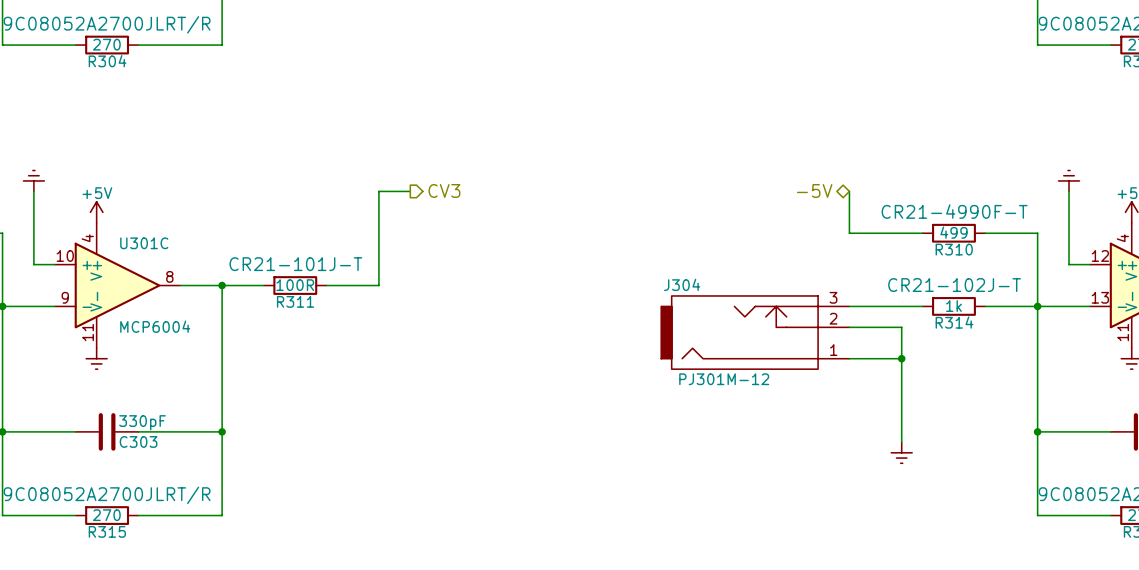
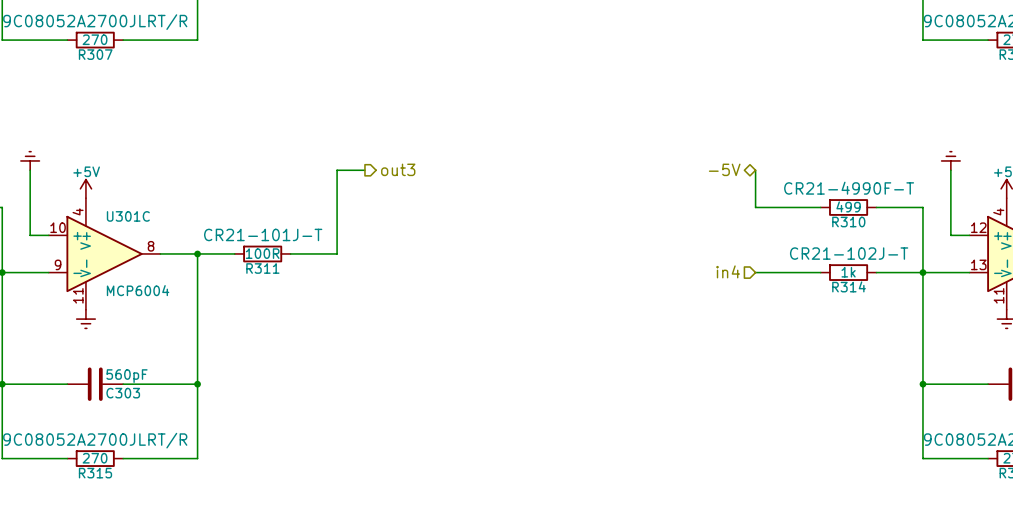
R304 name: R304 (107, 61) -> R307 (95, 54)
hierarchical label: CV3 (444, 190) -> out3 (398, 169)
hierarchical label: none -> in4 (728, 271)
wire: (849, 327) (901, 327) (901, 442) -> none
J304: PJ301M-12 (755, 332) -> none
wire: (849, 358) (901, 358) -> none
junction: (901, 358) -> none
C303 value: 330pF (142, 422) -> 560pF (126, 376)
power symbol: (901, 452) -> none

